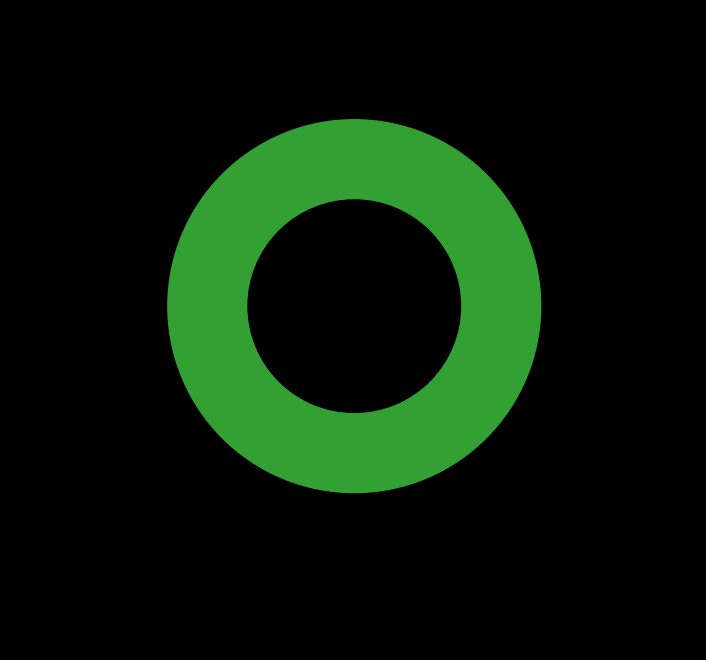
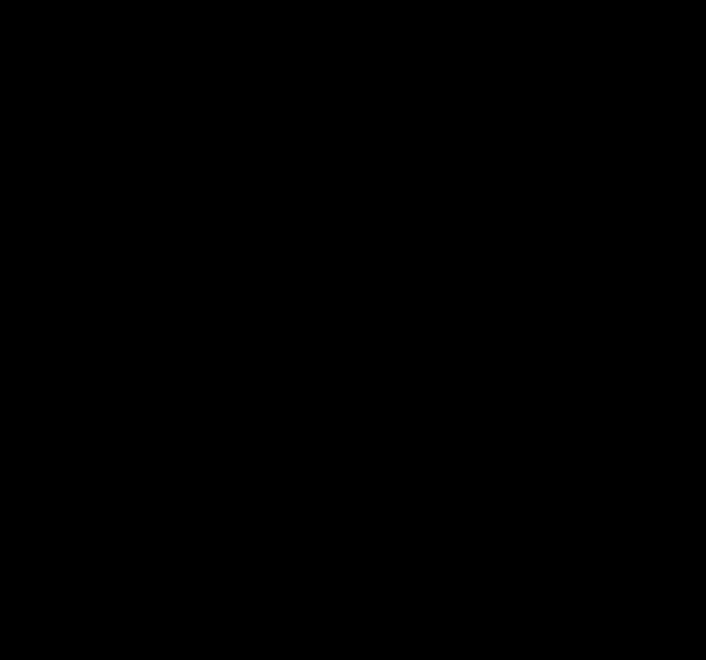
part: (354, 306) -> none

